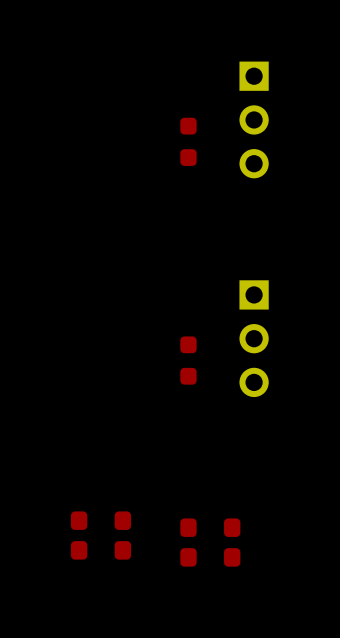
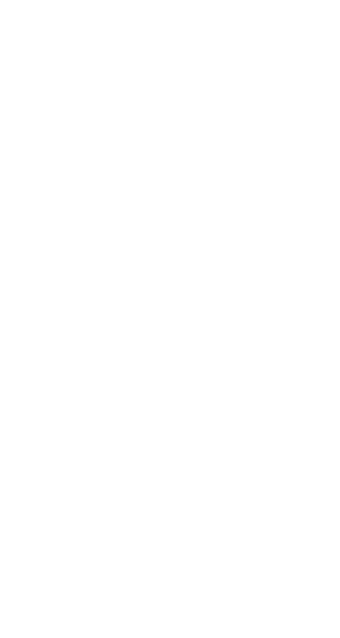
part: (254, 119) -> none
part: (188, 141) -> none
part: (254, 338) -> none
part: (188, 360) -> none
part: (79, 535) -> none
part: (122, 535) -> none
part: (188, 542) -> none
part: (232, 542) -> none

